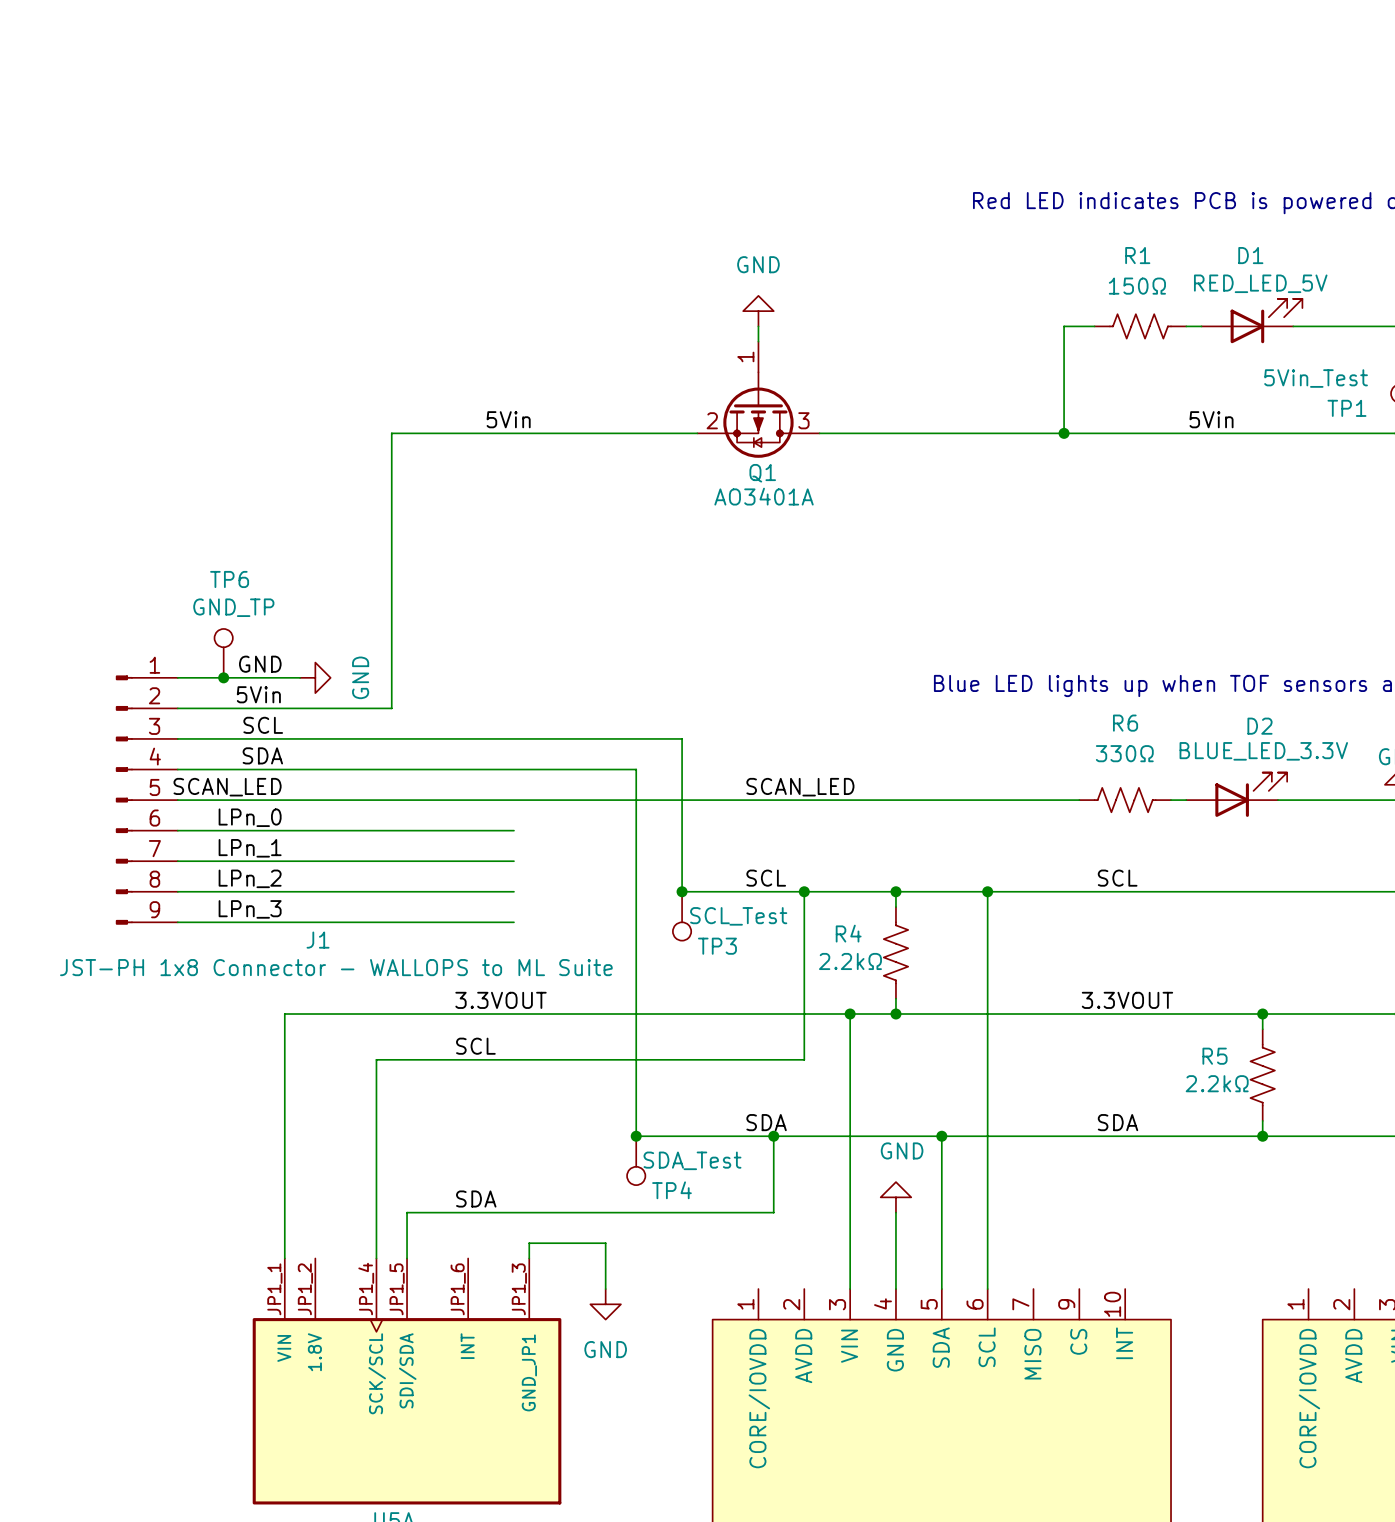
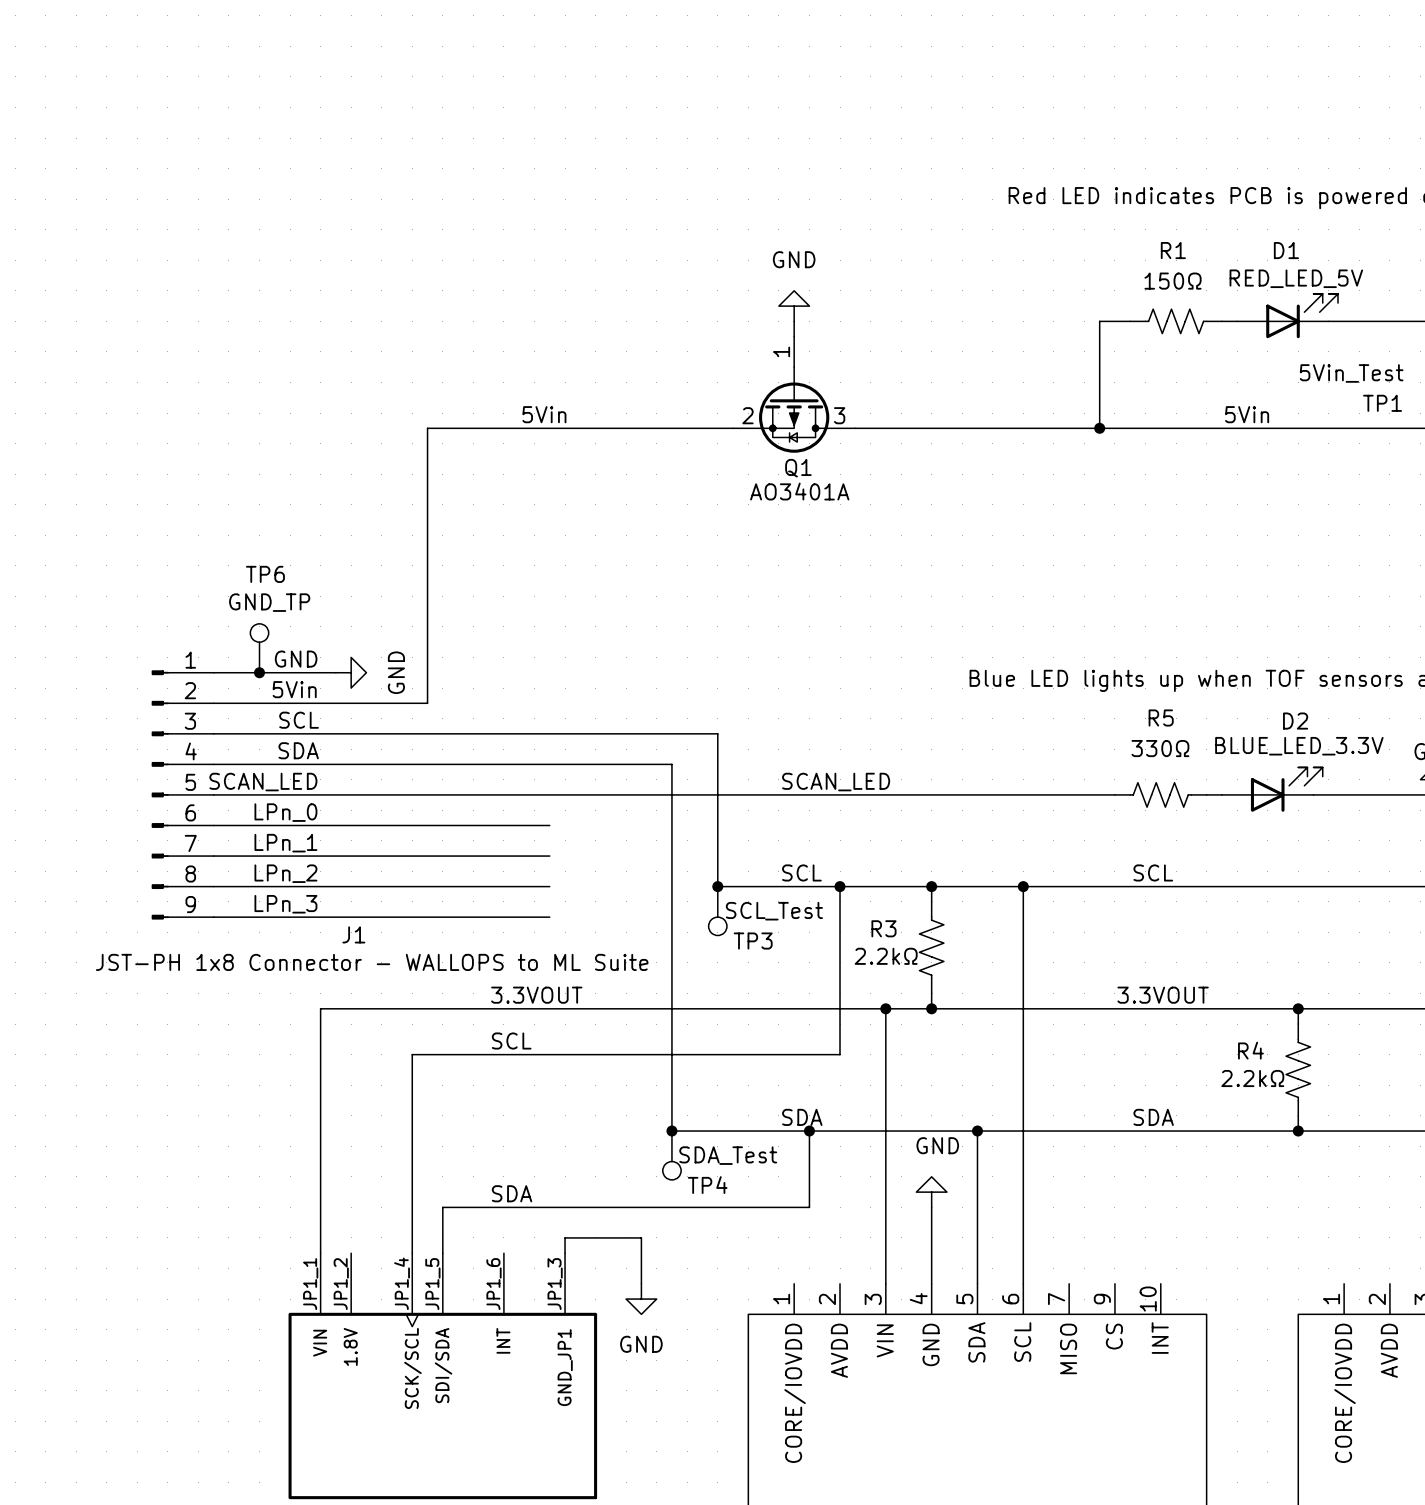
R6 name: R6 (1125, 723) -> R5 (1161, 717)
R4 name: R4 (848, 933) -> R3 (883, 928)
R5 name: R5 (1215, 1056) -> R4 (1250, 1050)

